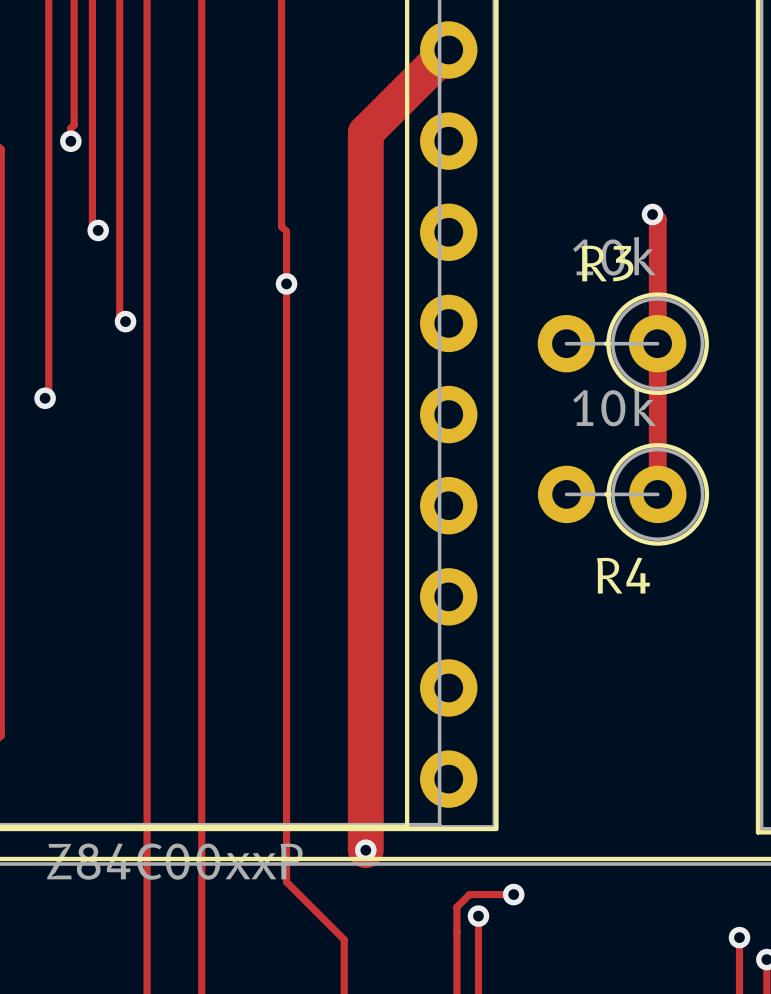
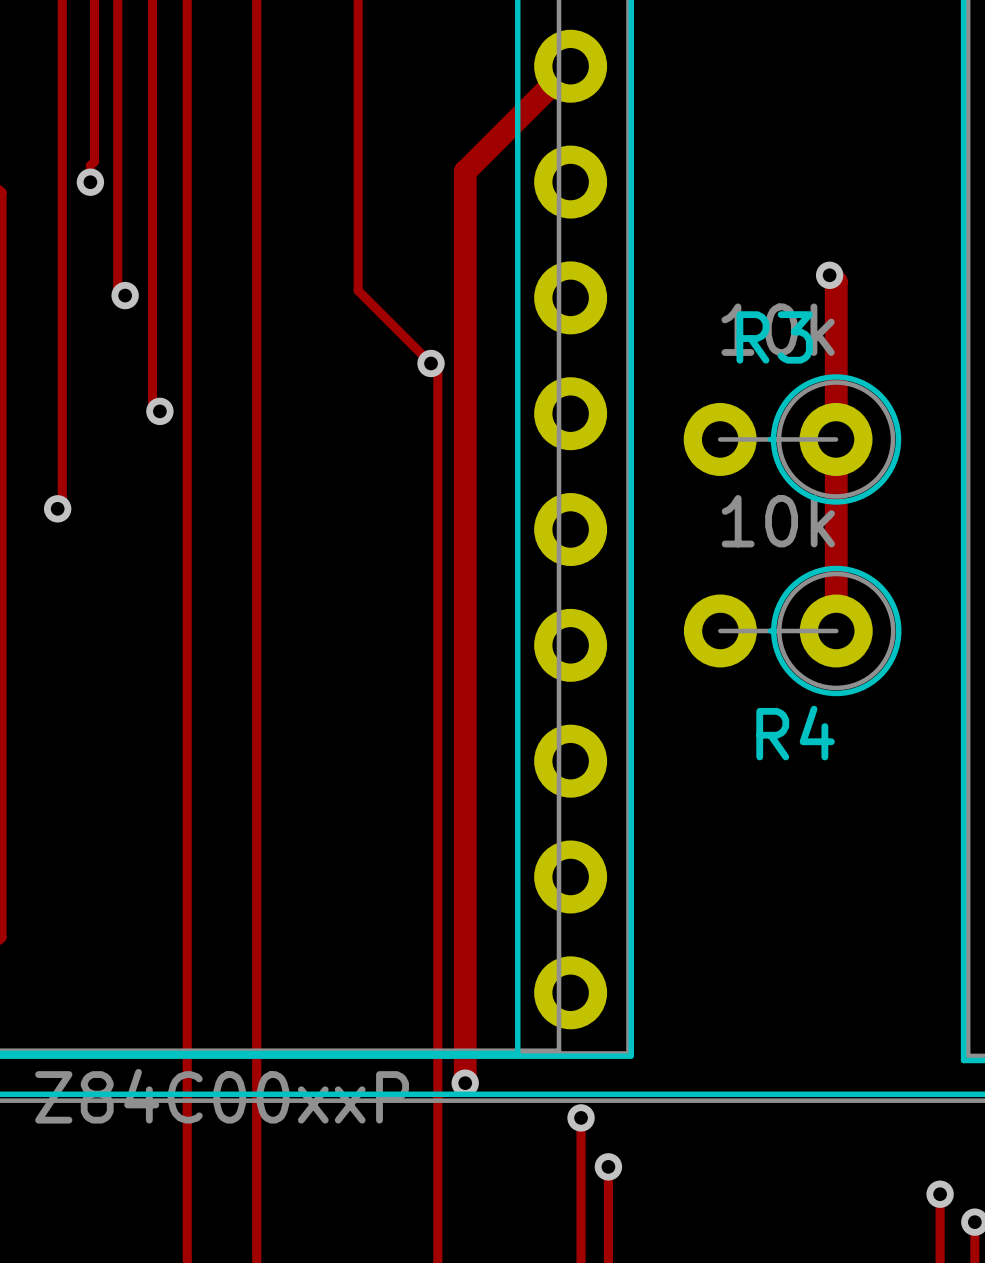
track width: thick (448, 49) (365, 132) (365, 850) -> thin (570, 66) (465, 171) (465, 1083)
track: (286, 231) (286, 882) (344, 939) -> (364, 296) (437, 370) (437, 1196)
via position: (286, 283) -> (431, 363)
track: (513, 894) (469, 894) (456, 907) -> (581, 1117) (581, 1155)
via position: (513, 894) -> (581, 1117)

